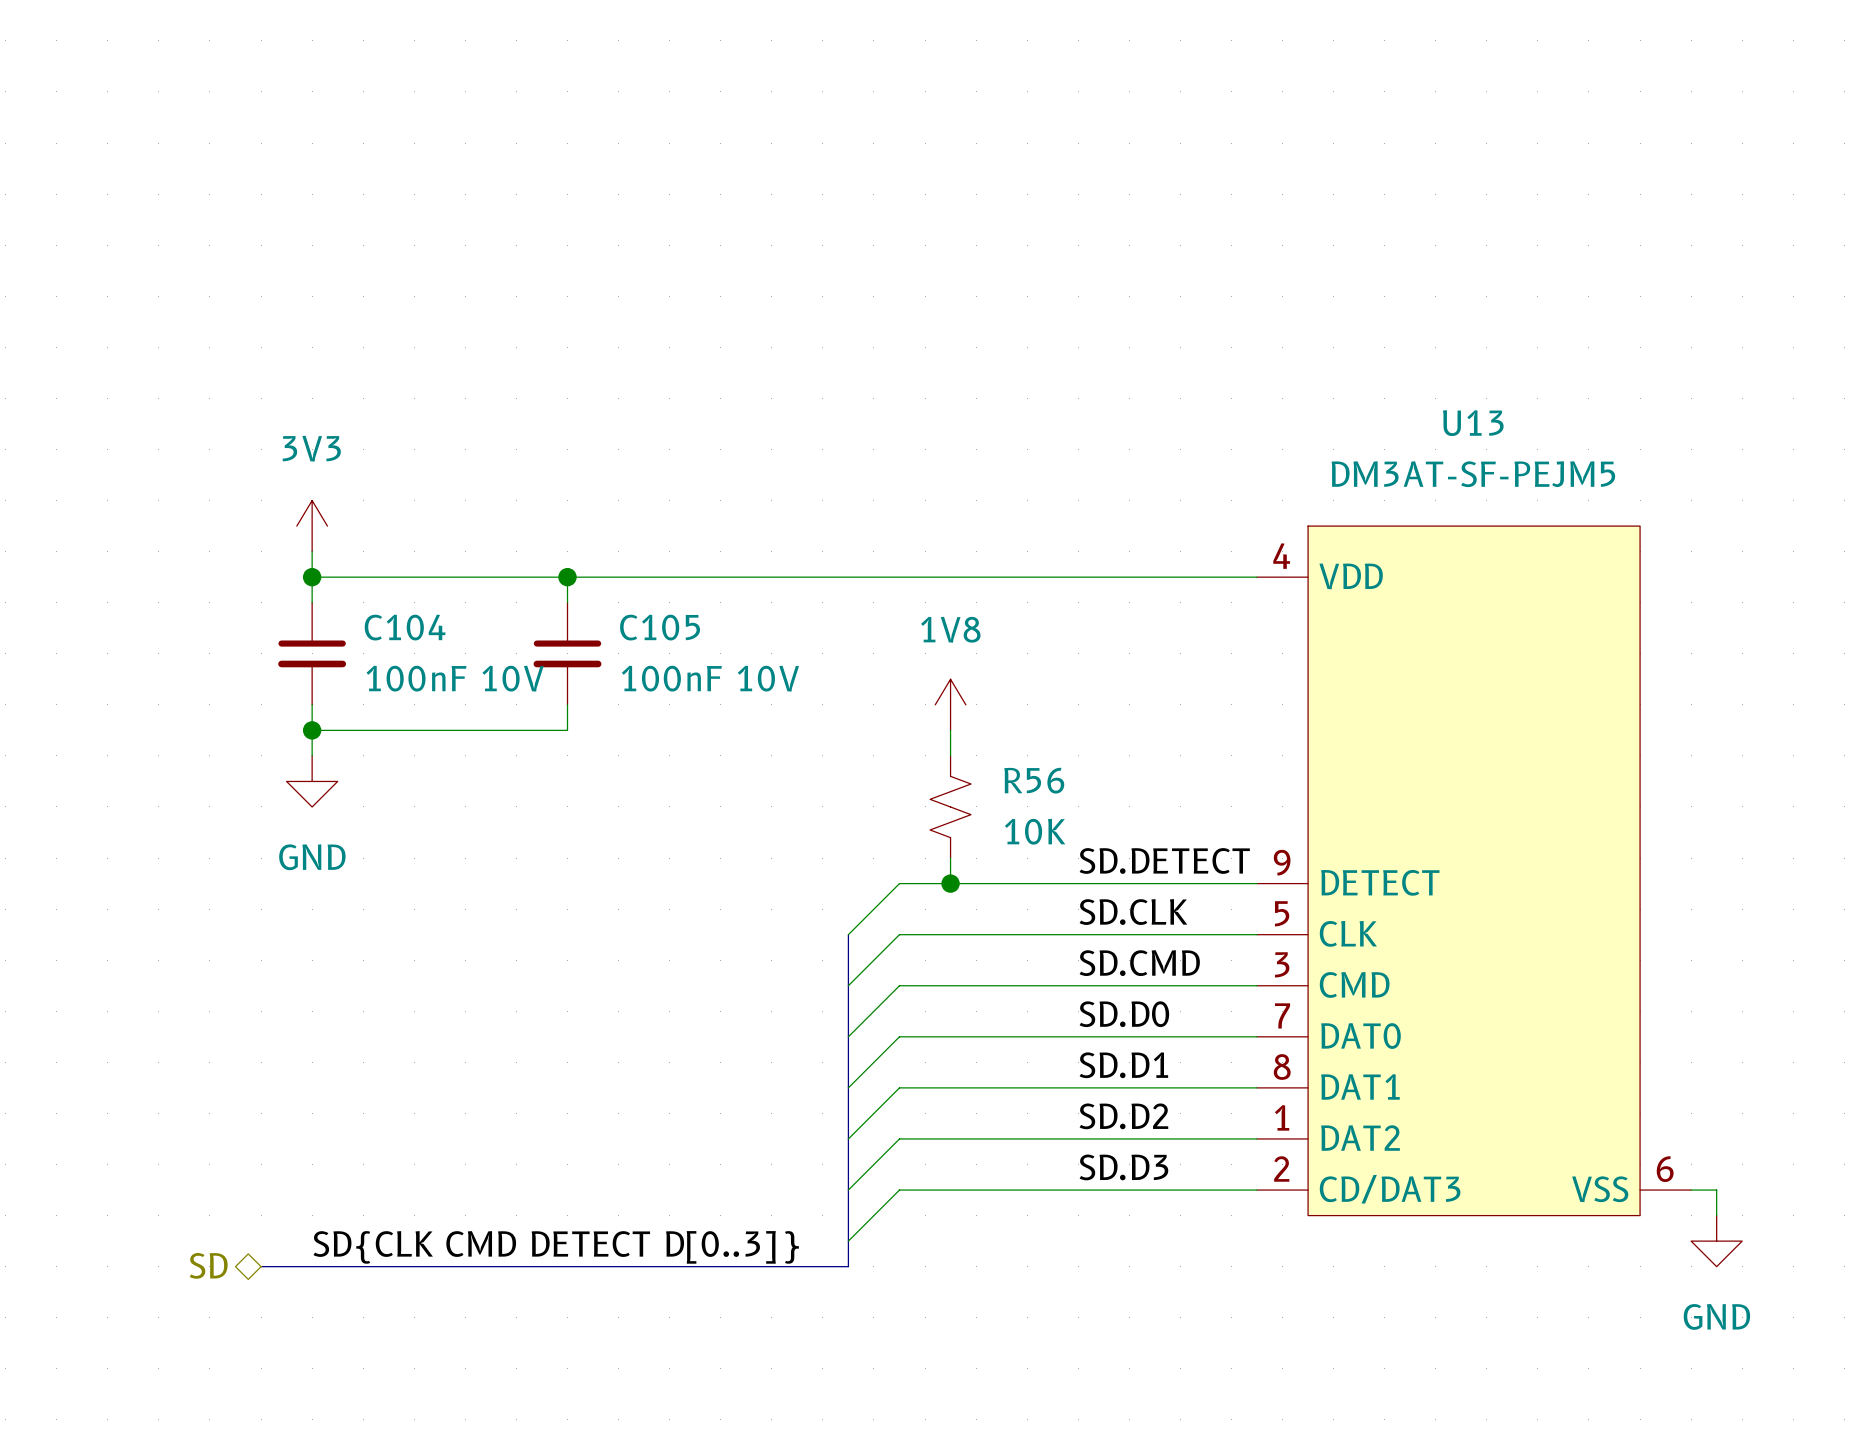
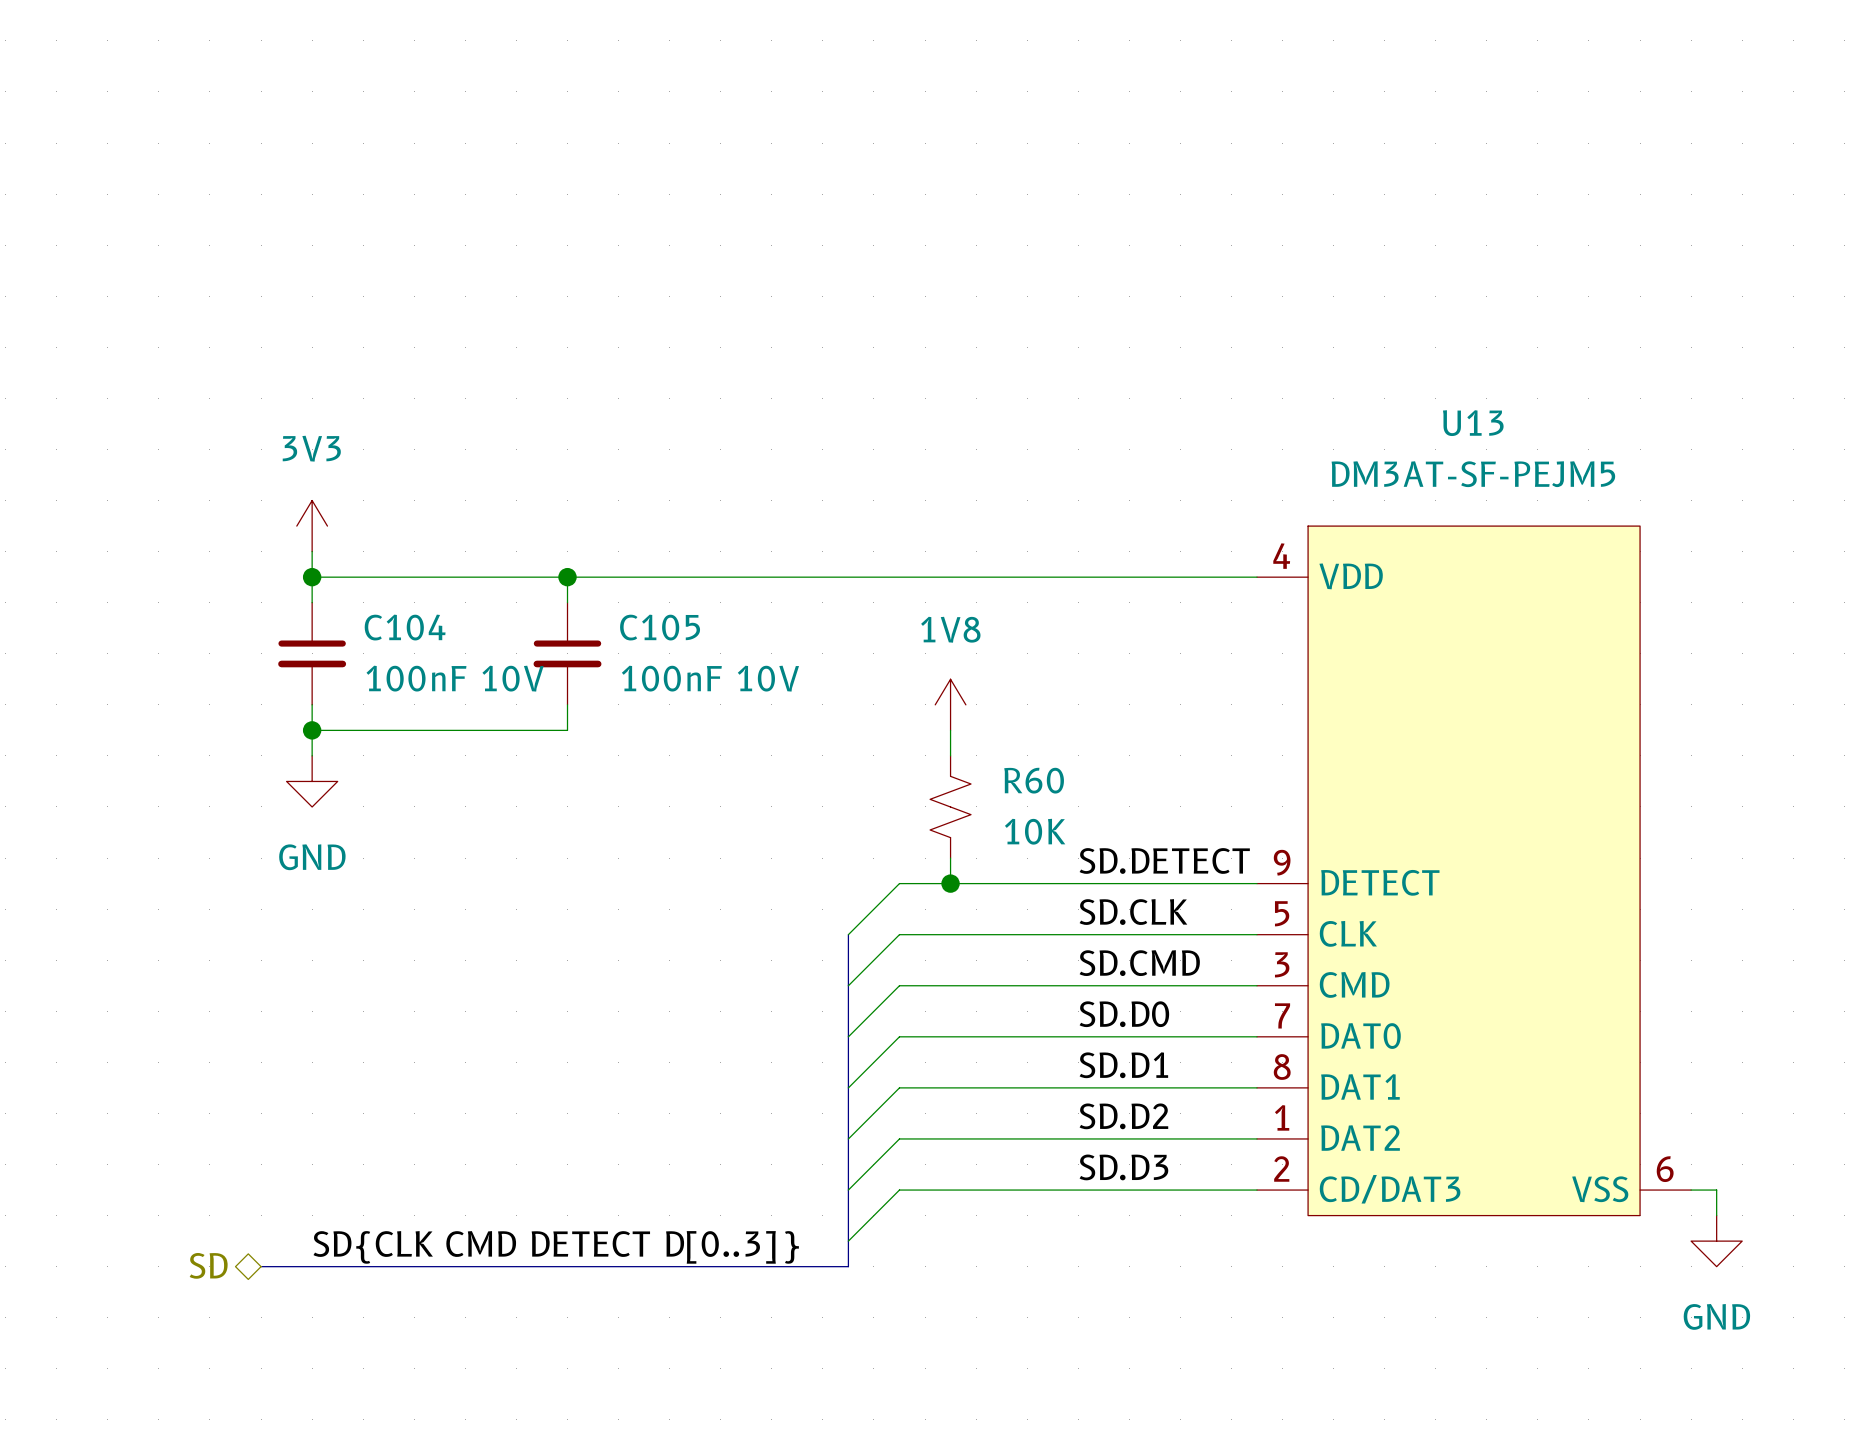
R56 name: R56 (1034, 780) -> R60 (1034, 780)

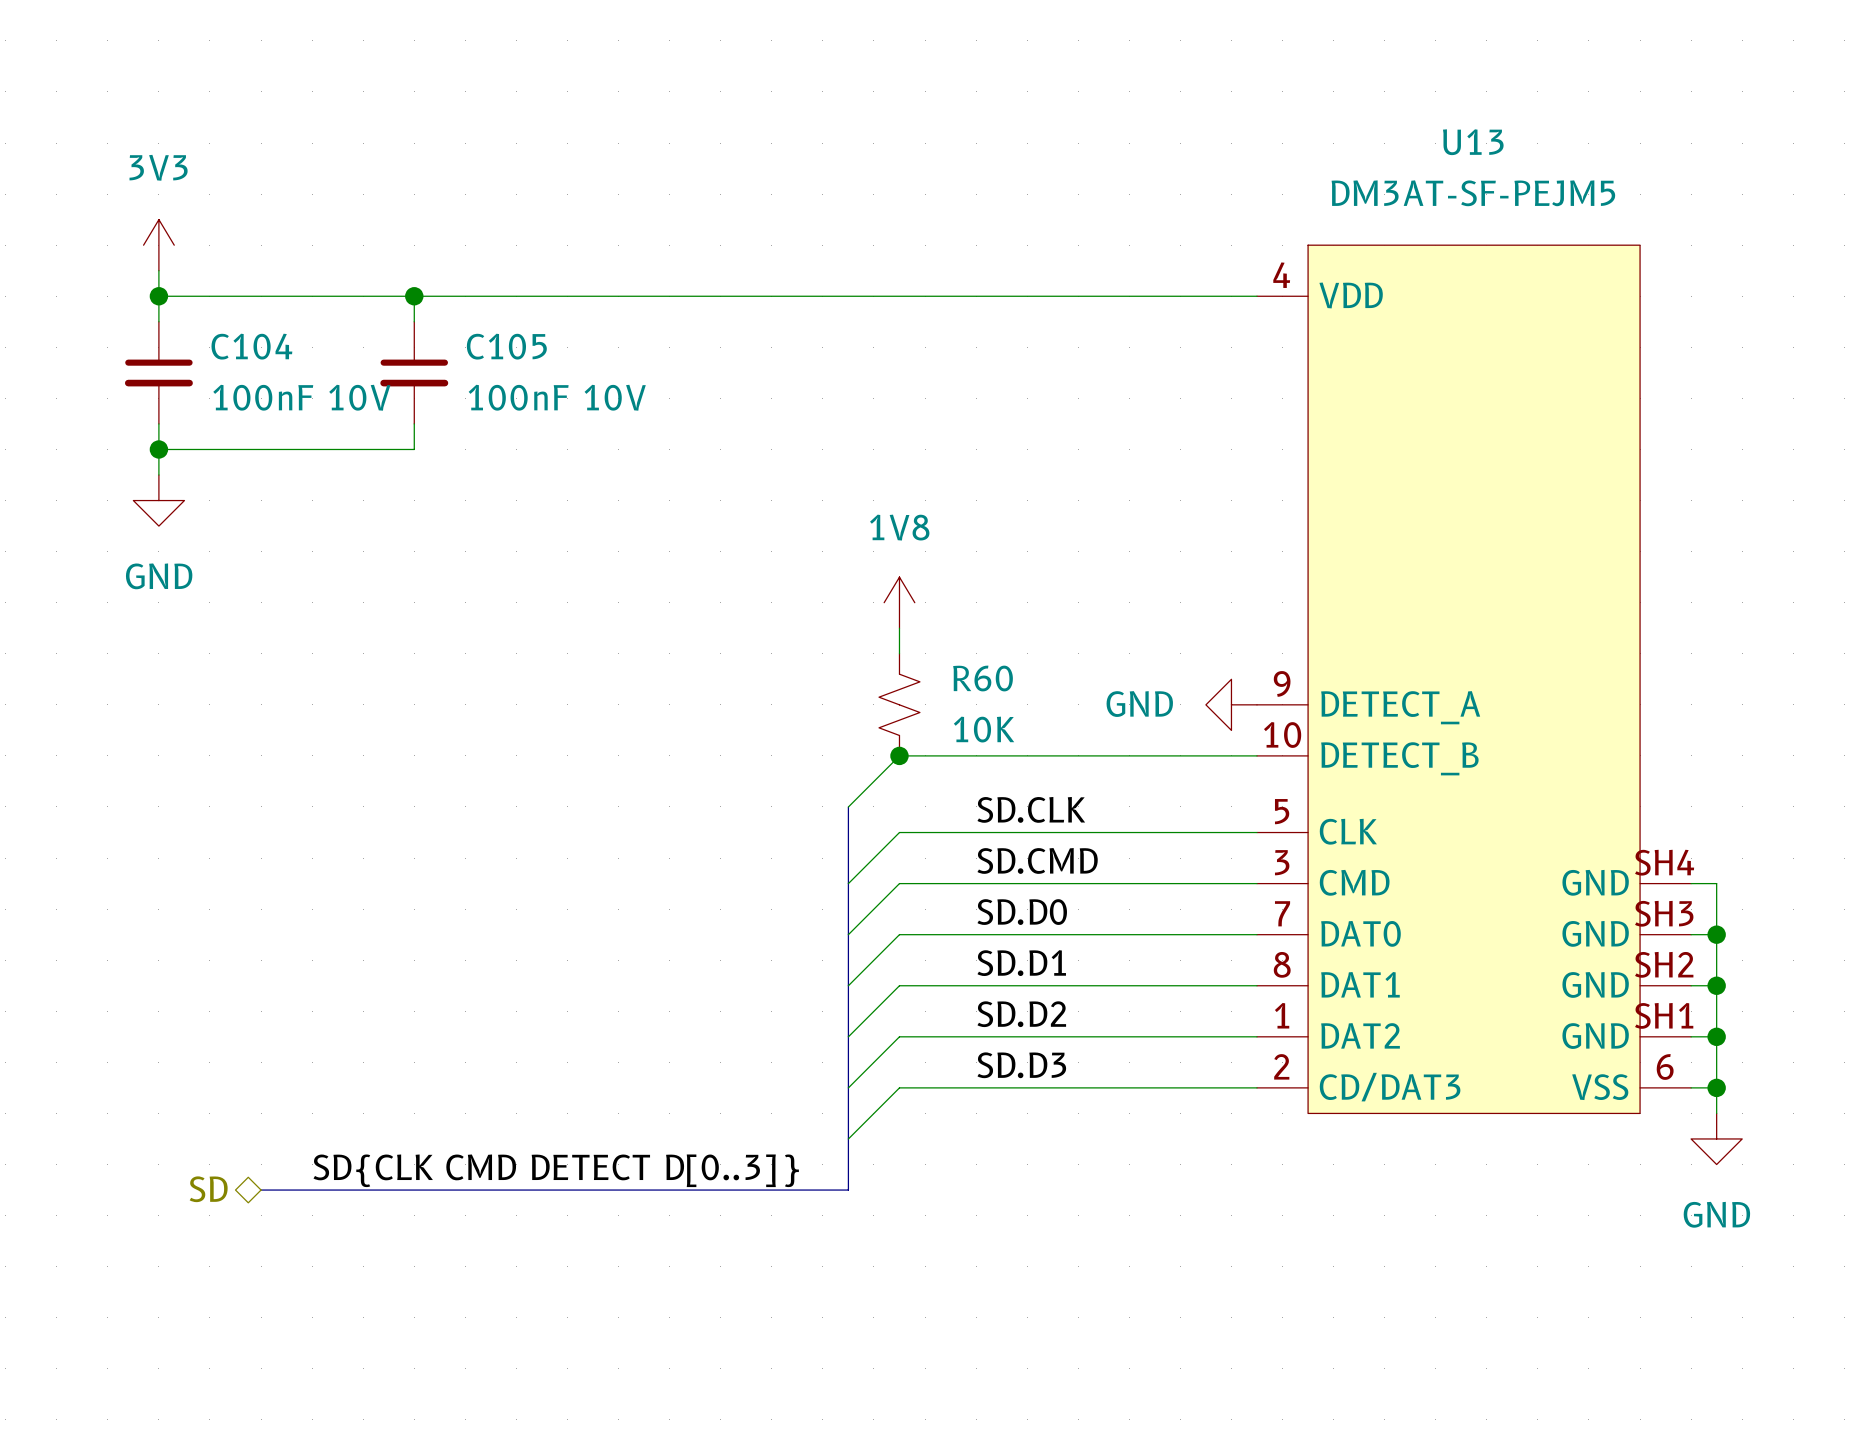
wire: none -> (158, 296) (1256, 296)
junction: none -> (158, 296)
junction: none -> (414, 296)
U13 name position: U13 (1473, 423) -> U13 (1473, 142)
junction: none -> (158, 449)
U13 value position: DM3AT-SF-PEJM5 (1473, 474) -> DM3AT-SF-PEJM5 (1473, 193)
power symbol position: 3V3 (312, 526) -> 3V3 (158, 245)
U13 symbol: [1256, 526, 1692, 1216] -> [1256, 245, 1692, 1114]
wire: (312, 551) (312, 602) -> (158, 270) (158, 321)
wire: (312, 577) (1256, 577) -> none
junction: (312, 577) -> none
wire: (567, 577) (567, 602) -> (414, 296) (414, 321)
junction: (567, 577) -> none
C104 position: (312, 653) -> (158, 372)
C105 position: (567, 653) -> (414, 372)
wire: (312, 704) (312, 755) -> (158, 423) (158, 475)
wire: (567, 704) (567, 730) (312, 730) -> (414, 423) (414, 449) (158, 449)
power symbol position: 1V8 (950, 704) -> 1V8 (899, 602)
power symbol: none -> GND (1231, 704)
junction: (312, 730) -> none
wire: (950, 730) (950, 755) -> (899, 628) (899, 653)
junction: none -> (899, 755)
power symbol position: GND (312, 781) -> GND (158, 500)
bus: none -> (848, 806) (848, 934)
R60 position: (950, 806) -> (899, 704)
wire: (950, 858) (950, 883) -> none
label: SD.DETECT (1164, 860) -> none
junction: (950, 883) -> none
wire: none -> (1691, 883) (1716, 883) (1716, 1113)
label position: SD.CLK (1133, 912) -> SD.CLK (1031, 809)
wire: none -> (1691, 934) (1716, 934)
junction: none -> (1716, 934)
label position: SD.CMD (1139, 963) -> SD.CMD (1037, 860)
wire: none -> (1691, 985) (1716, 985)
junction: none -> (1716, 985)
label position: SD.D0 (1124, 1014) -> SD.D0 (1022, 912)
wire: none -> (1691, 1036) (1716, 1036)
junction: none -> (1716, 1036)
label position: SD.D1 (1123, 1065) -> SD.D1 (1021, 963)
wire: none -> (1691, 1087) (1716, 1087)
junction: none -> (1716, 1087)
label position: SD.D2 (1123, 1116) -> SD.D2 (1021, 1014)
wire: (1256, 1138) (899, 1138) (848, 1190) -> (1256, 832) (899, 832) (848, 883)
label position: SD.D3 (1123, 1167) -> SD.D3 (1021, 1065)
bus: (848, 1190) (848, 1266) (261, 1266) -> (848, 1190) (261, 1190)
wire: (1256, 1190) (899, 1190) (848, 1241) -> (1256, 755) (899, 755) (848, 806)
wire: (1691, 1190) (1716, 1190) (1716, 1215) -> none
power symbol position: GND (1716, 1241) -> GND (1716, 1138)
label position: SD{CLK CMD DETECT D[0..3]} (556, 1247) -> SD{CLK CMD DETECT D[0..3]} (556, 1170)
hierarchical label position: SD (208, 1265) -> SD (208, 1189)

